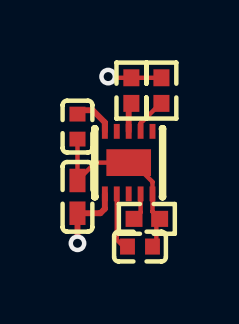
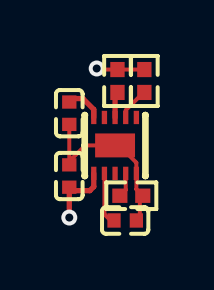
part footprint: [60, 159, 95, 234] -> [53, 150, 85, 202]

